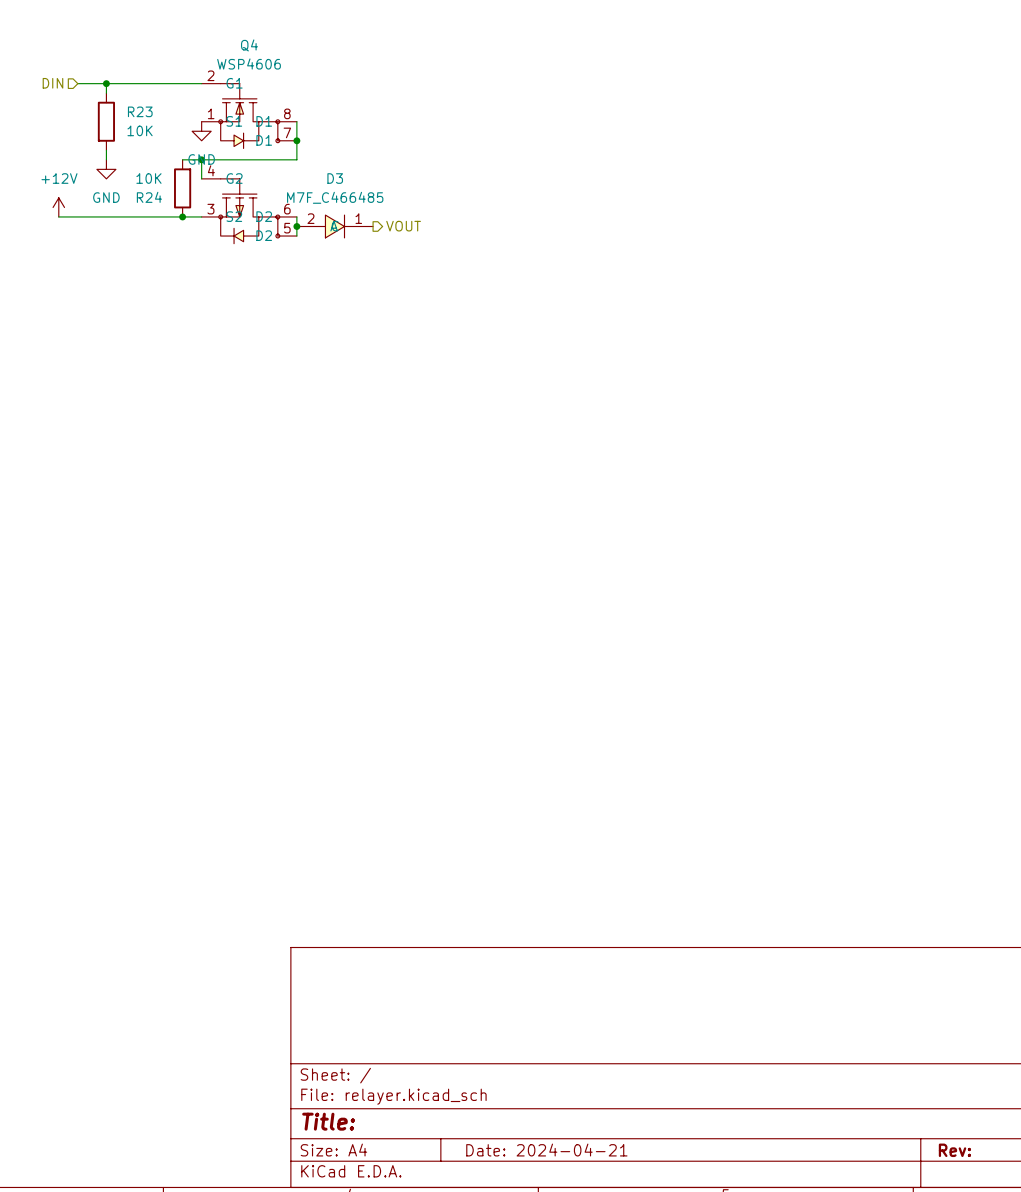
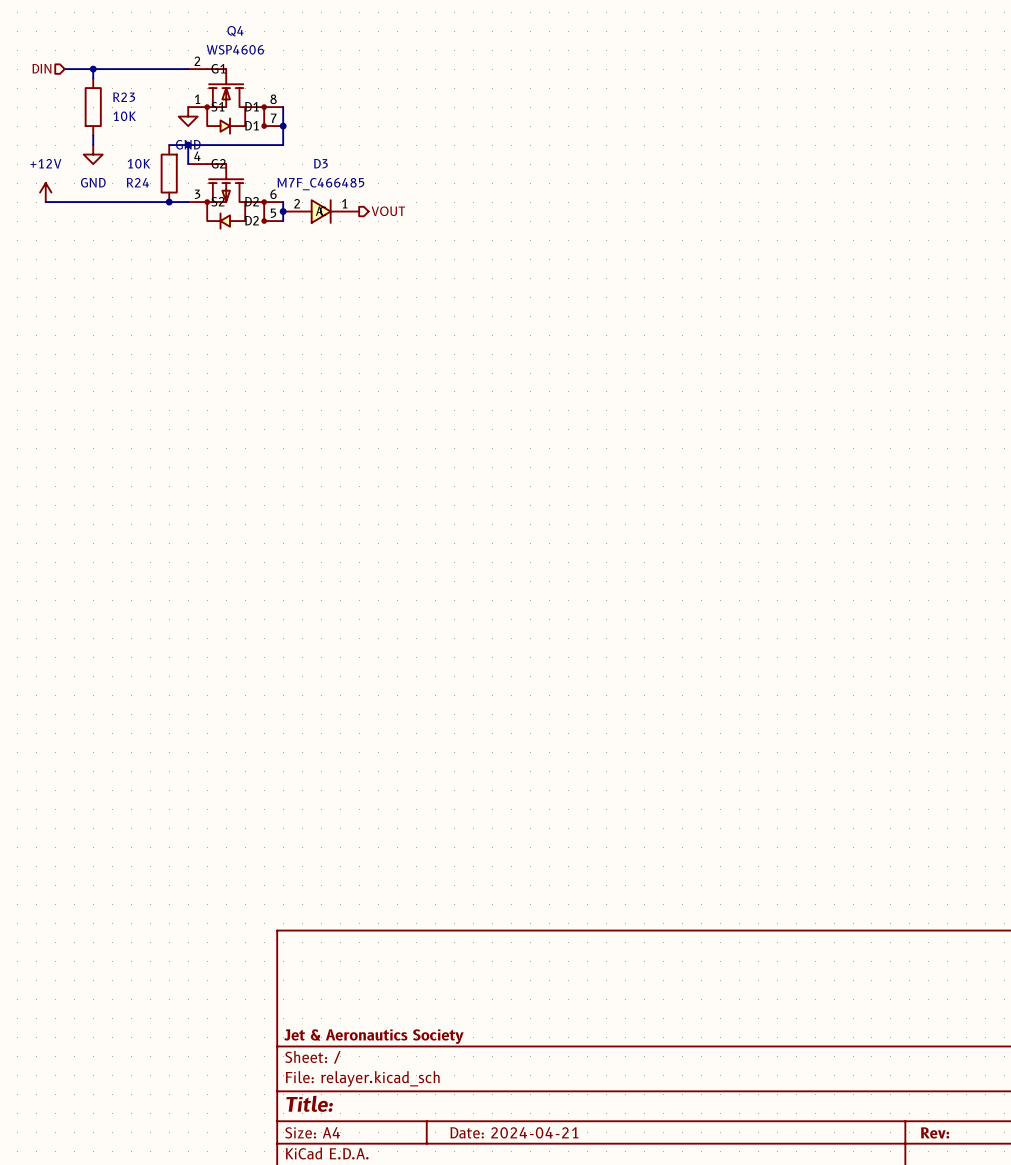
title block: none -> Jet & Aeronautics Society (373, 1036)

